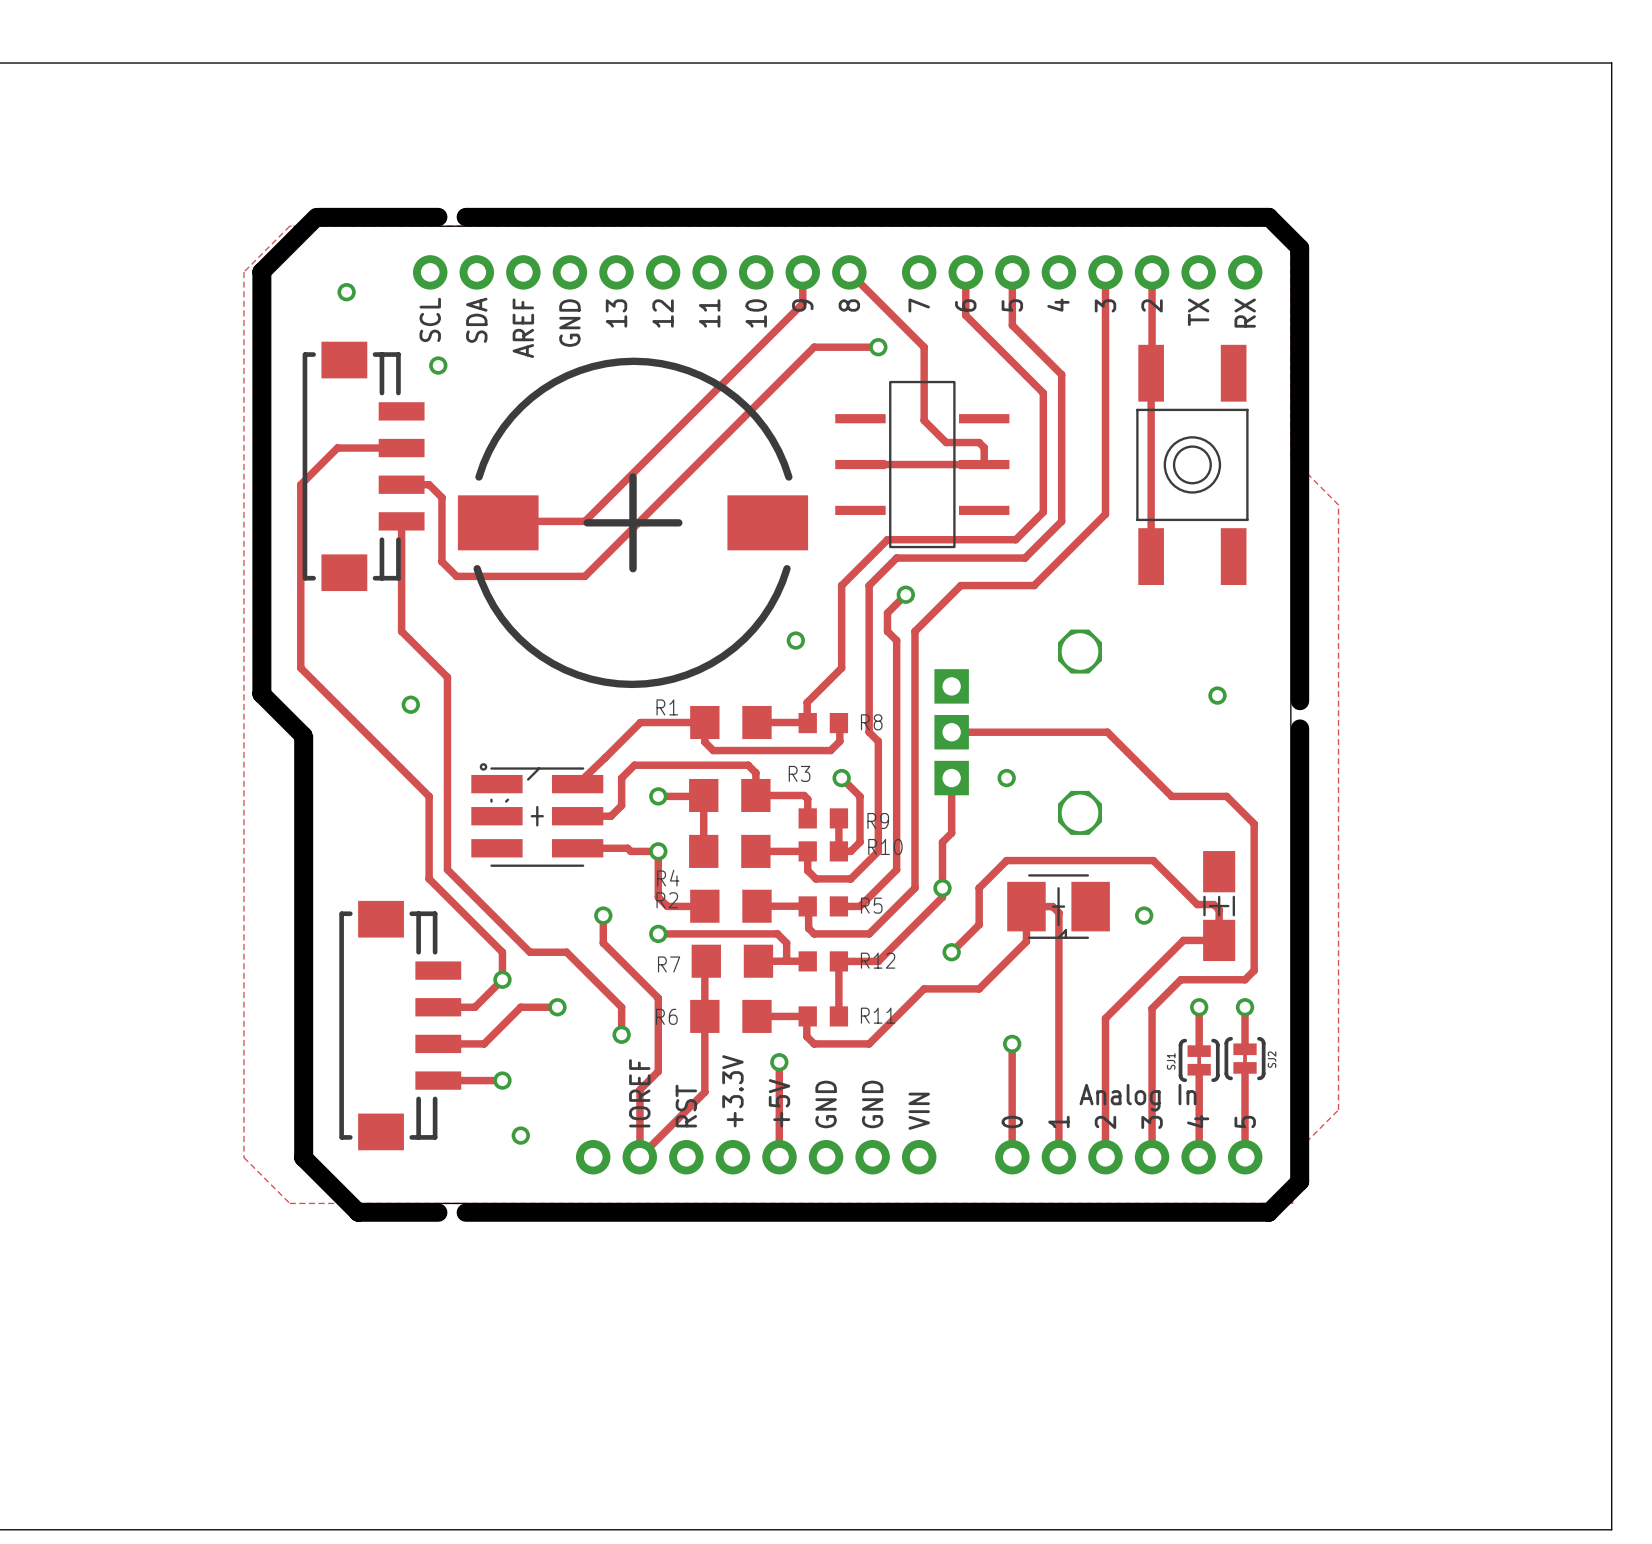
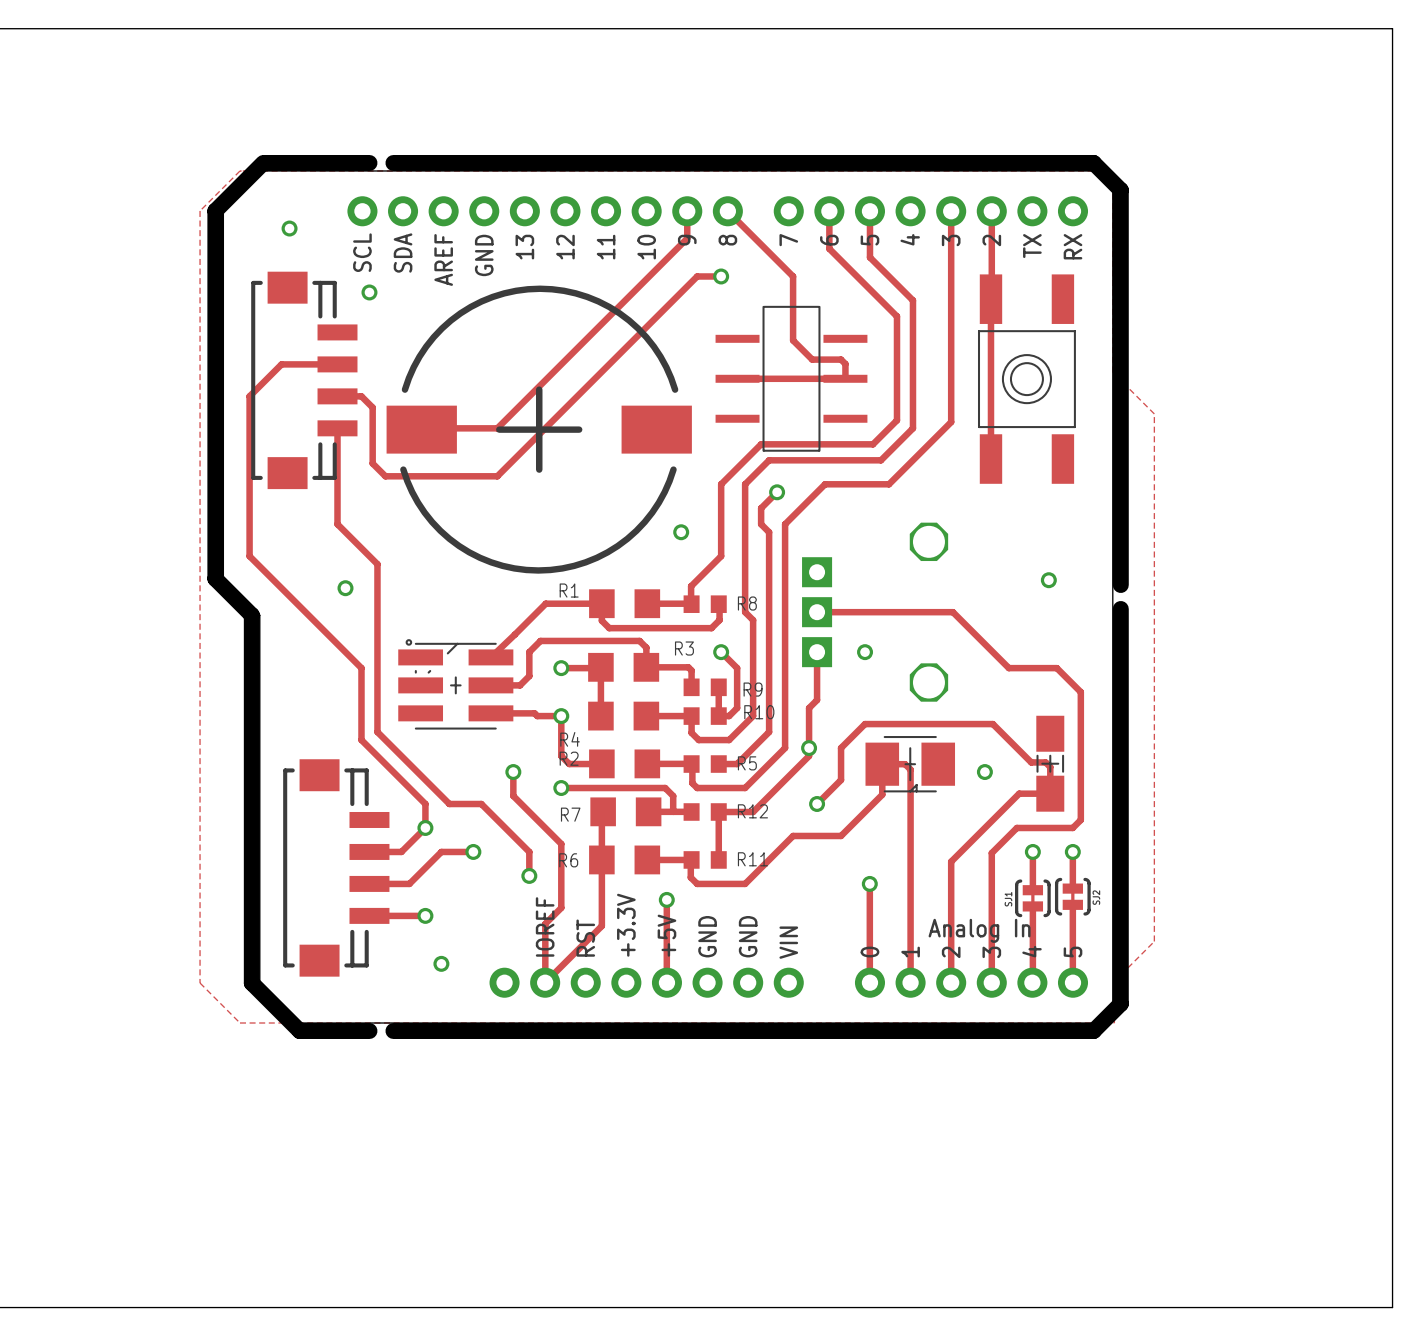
track: (841, 347) (878, 347) -> none
via position: (878, 347) -> (721, 276)

